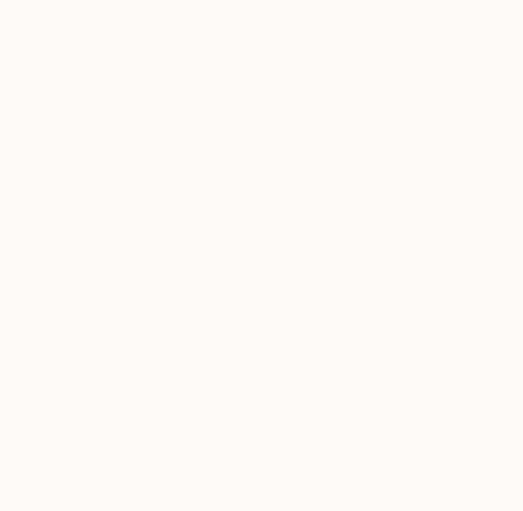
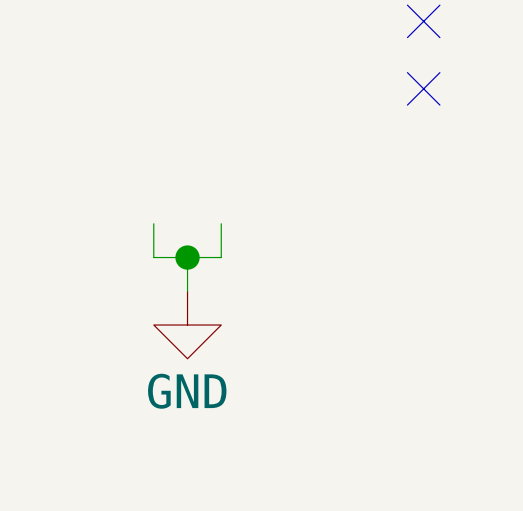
no-connect mark: none -> (423, 21)
no-connect mark: none -> (423, 88)
wire: none -> (153, 223) (153, 257) (221, 257) (221, 223)
wire: none -> (187, 257) (187, 291)
junction: none -> (187, 257)
power symbol: none -> GND (187, 325)

